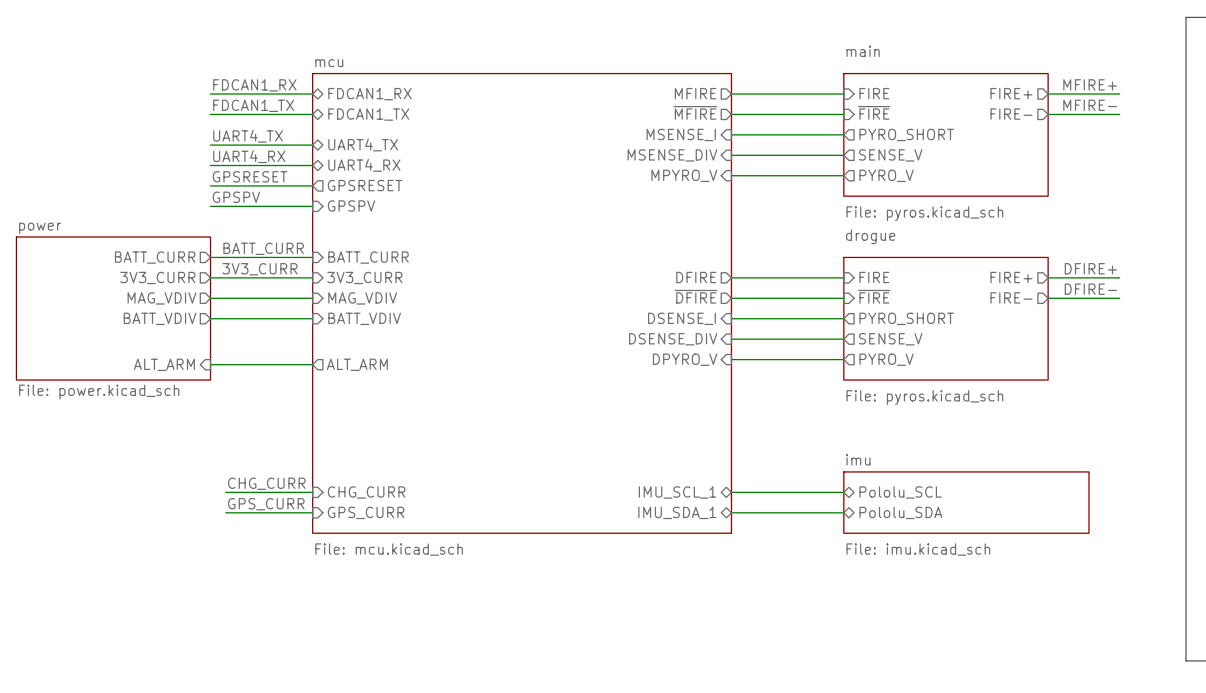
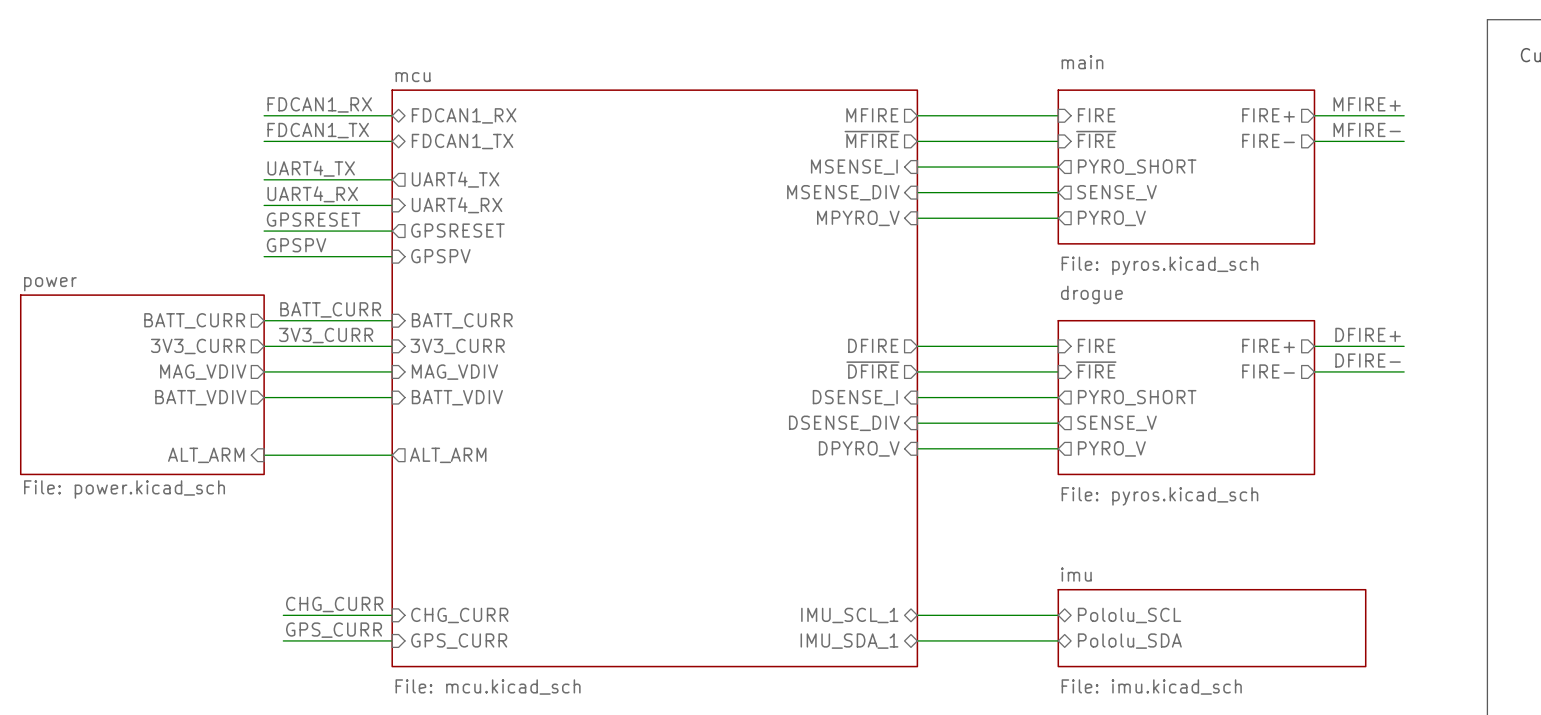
sheet pin shape: bidirectional (363, 144) -> output (455, 179)
sheet pin shape: bidirectional (364, 165) -> input (457, 205)

